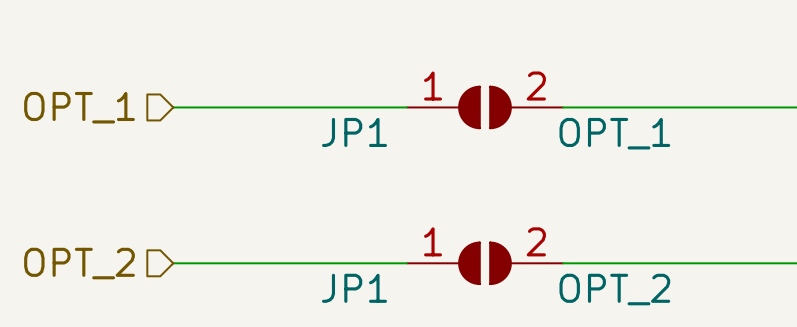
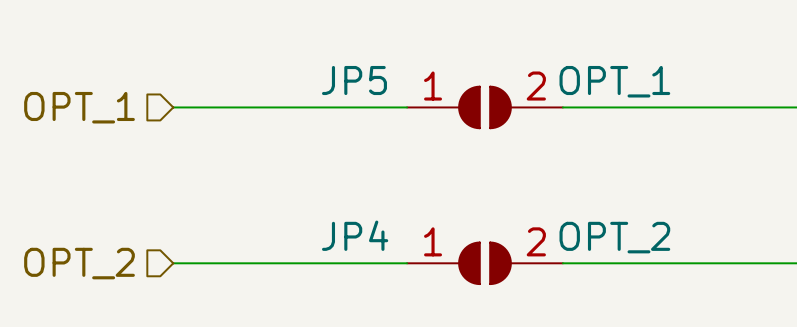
JP1 name: JP1 (354, 132) -> JP5 (354, 80)
JP1 value position: OPT_1 (614, 133) -> OPT_1 (614, 81)
JP1 name: JP1 (354, 288) -> JP4 (355, 235)
JP1 value position: OPT_2 (614, 289) -> OPT_2 (614, 237)

